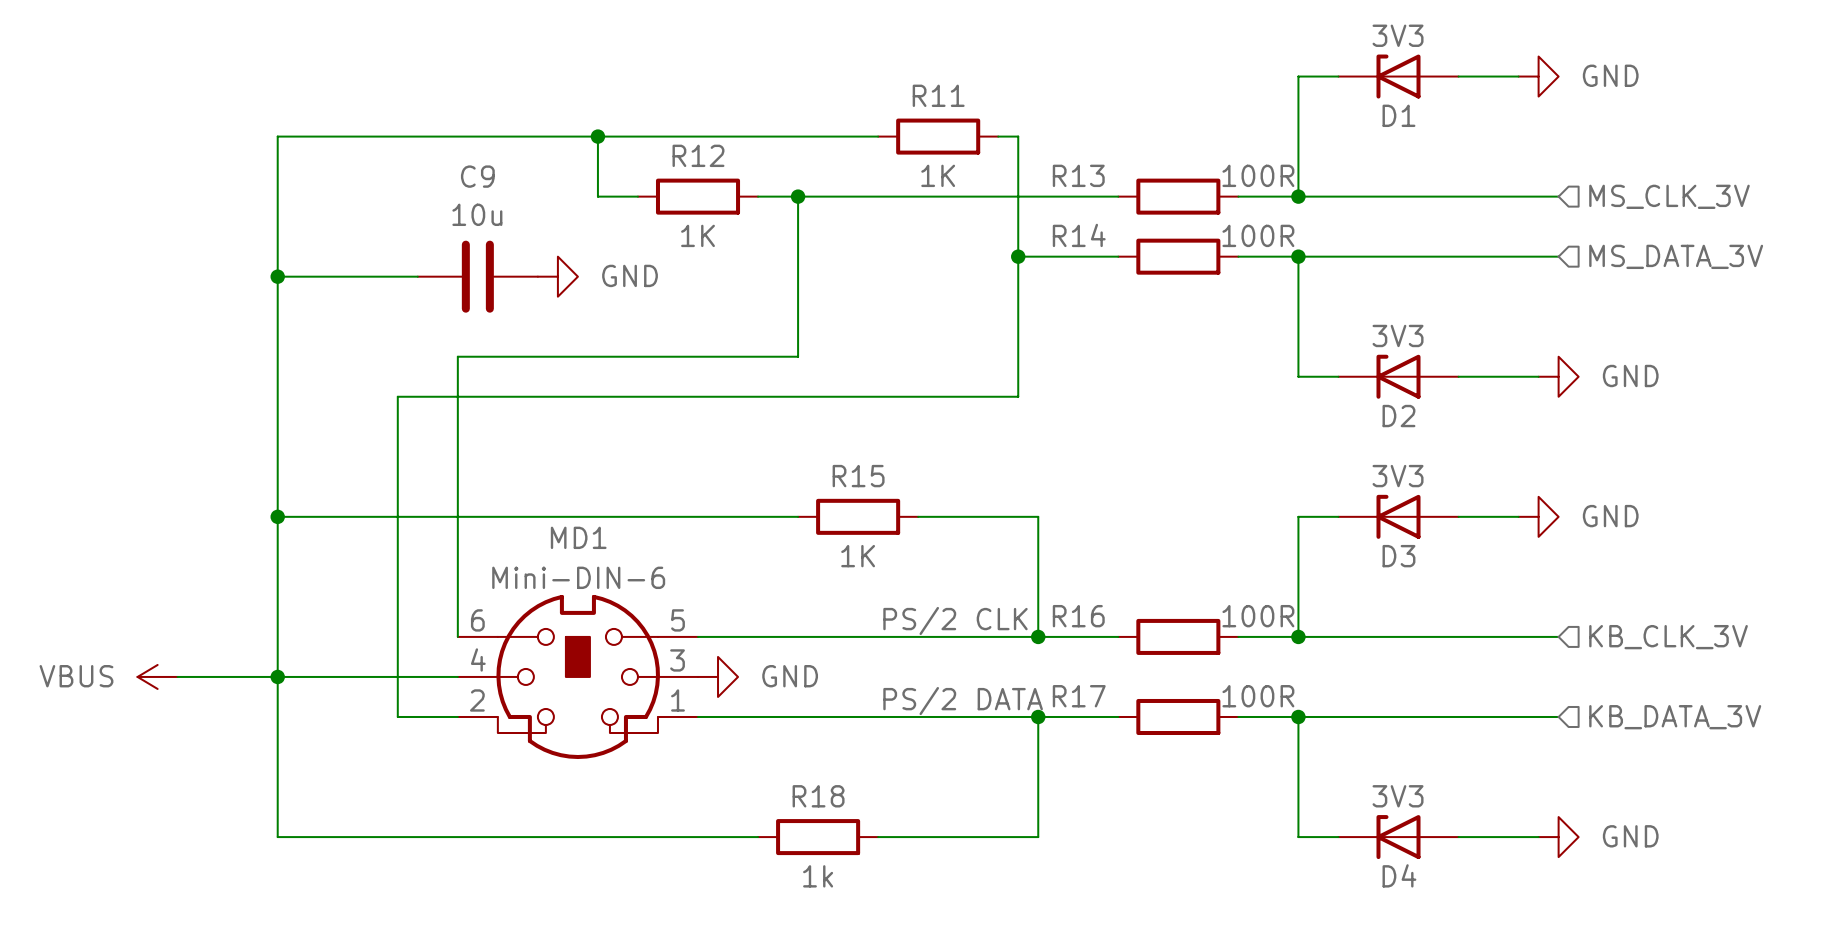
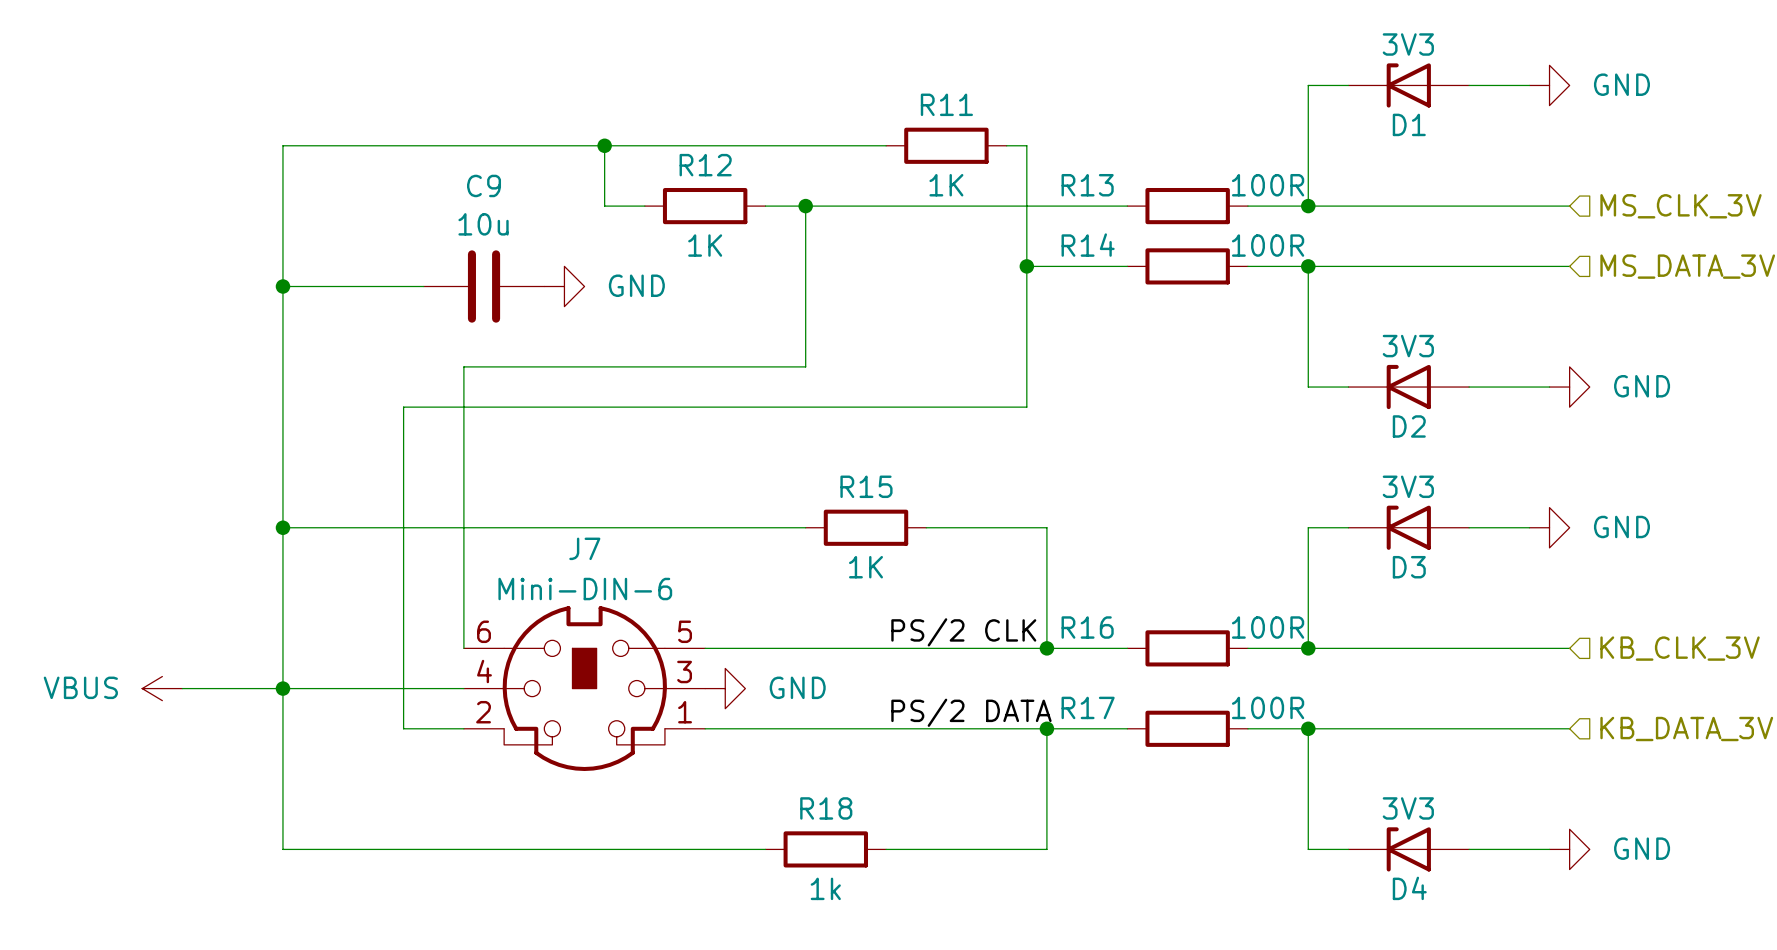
MD1 name: MD1 (578, 537) -> J7 (584, 548)

